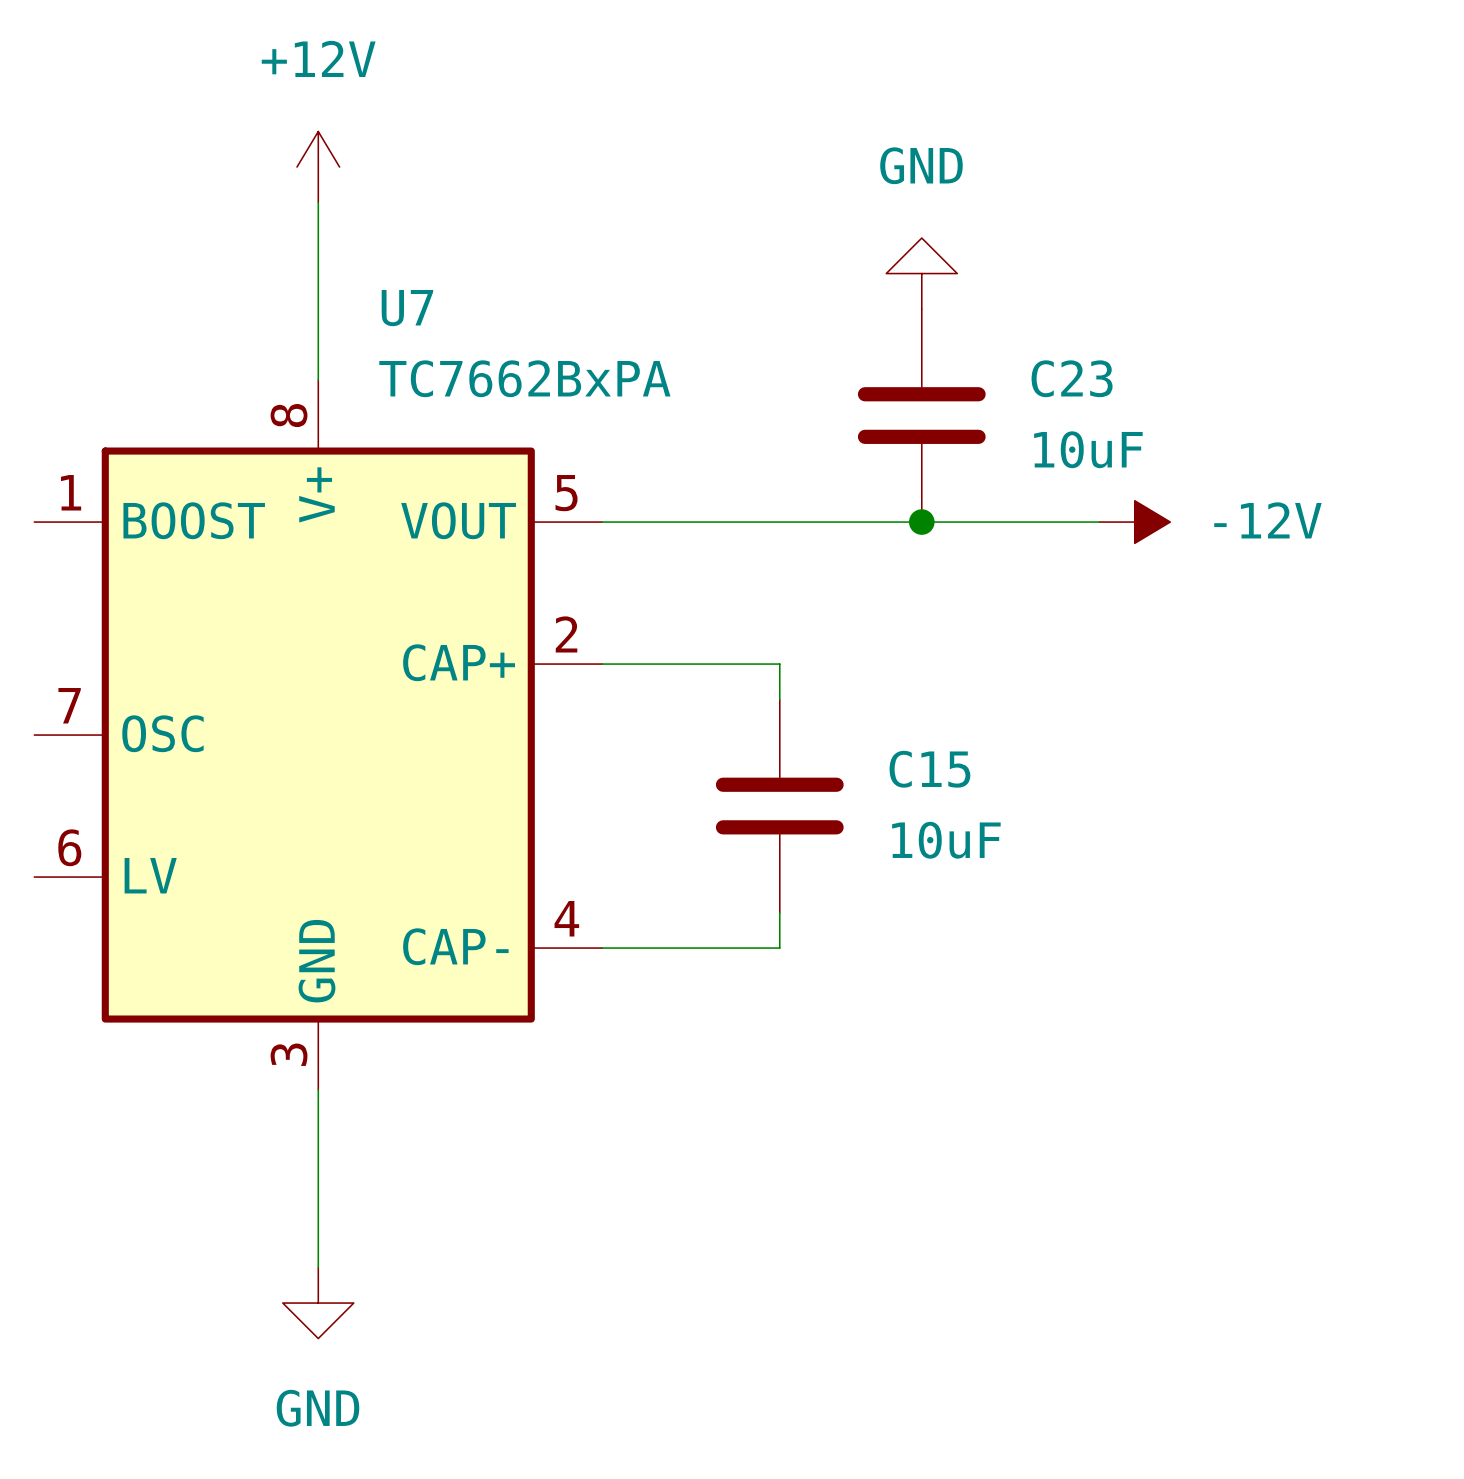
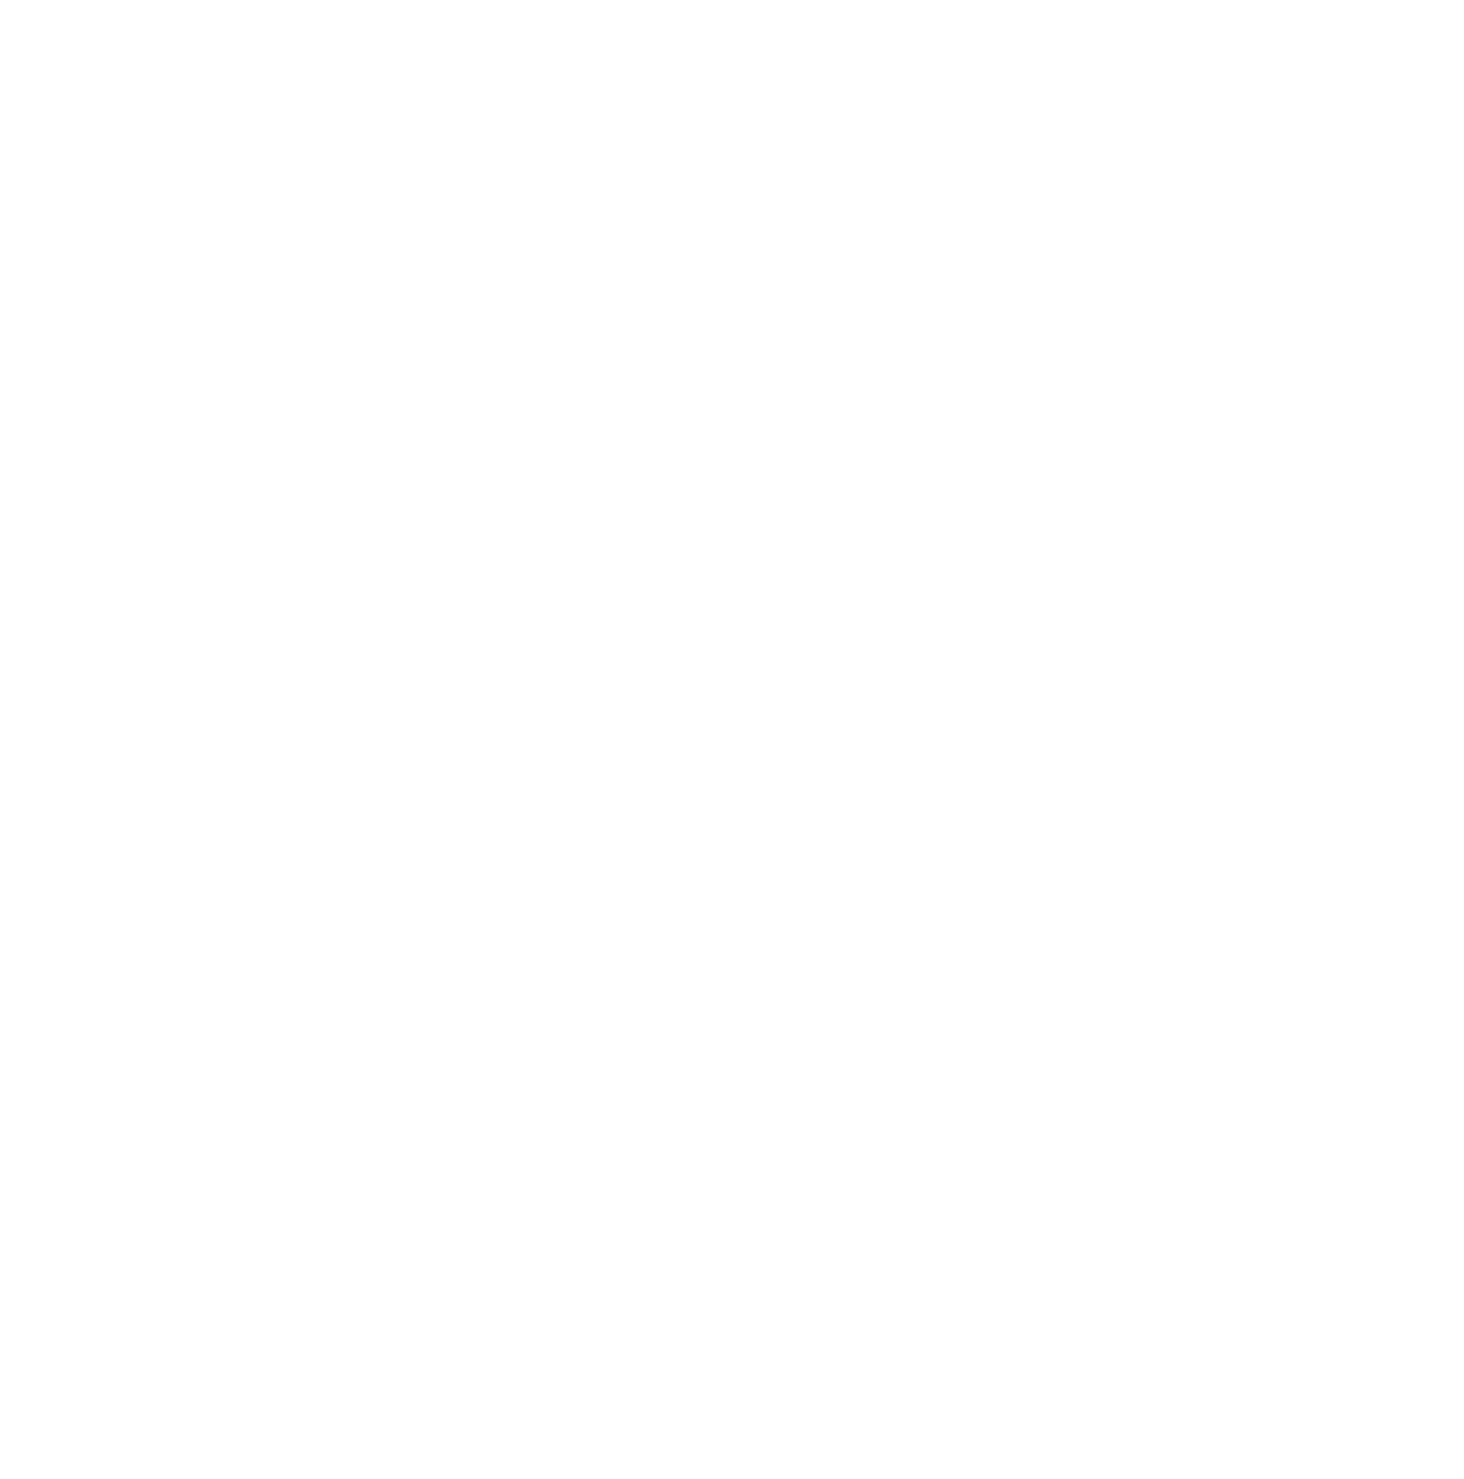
power symbol: +12V (318, 167) -> none
wire: (318, 202) (318, 380) -> none
power symbol: GND (921, 273) -> none
C23: 10uF (921, 415) -> none
wire: (602, 522) (1099, 522) -> none
junction: (921, 522) -> none
power symbol: -12V (1134, 522) -> none
wire: (602, 664) (779, 664) (779, 699) -> none
U7: TC7662BxPA (318, 735) -> none
C15: 10uF (779, 806) -> none
wire: (779, 912) (779, 948) (602, 948) -> none
wire: (318, 1090) (318, 1267) -> none
power symbol: GND (318, 1303) -> none

